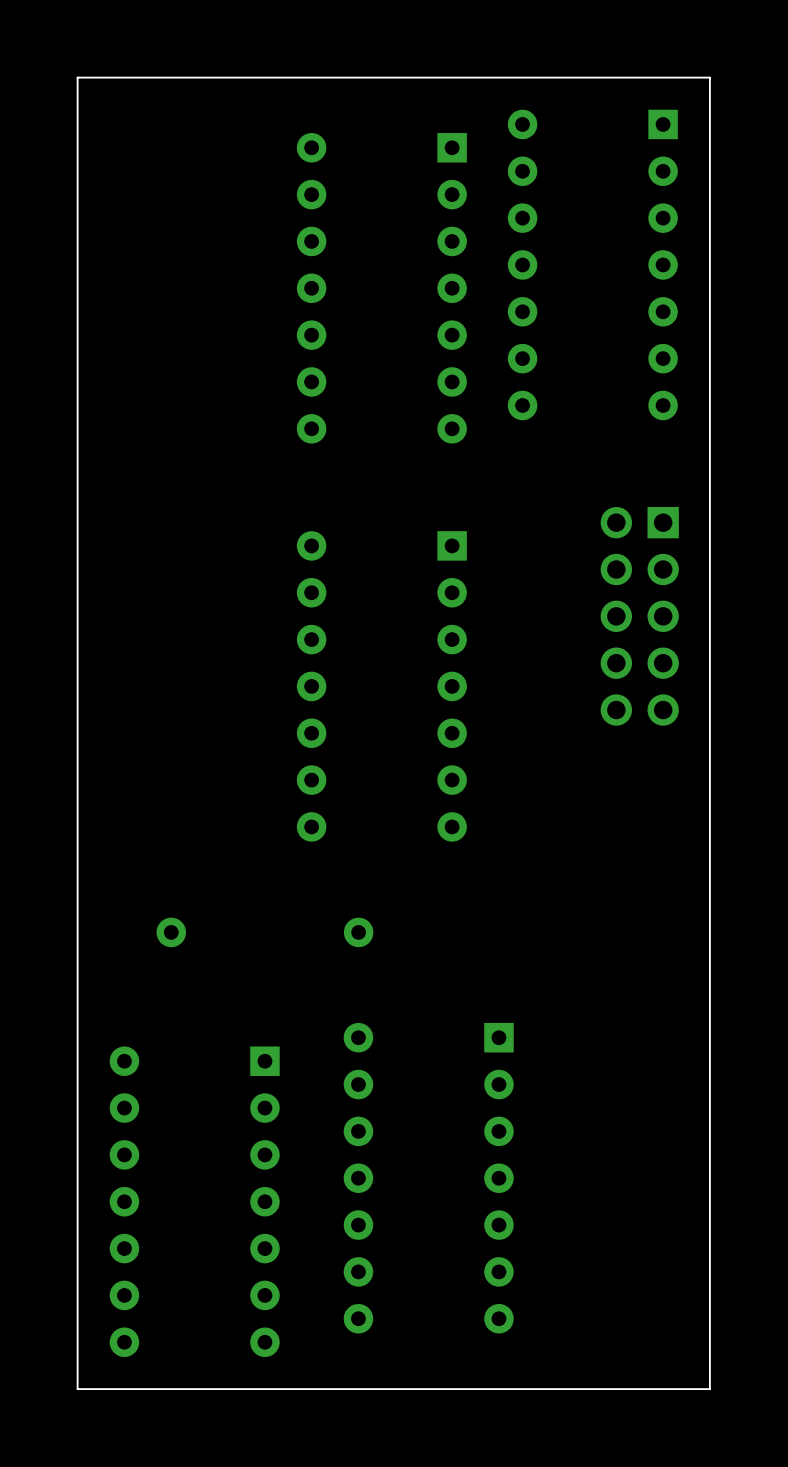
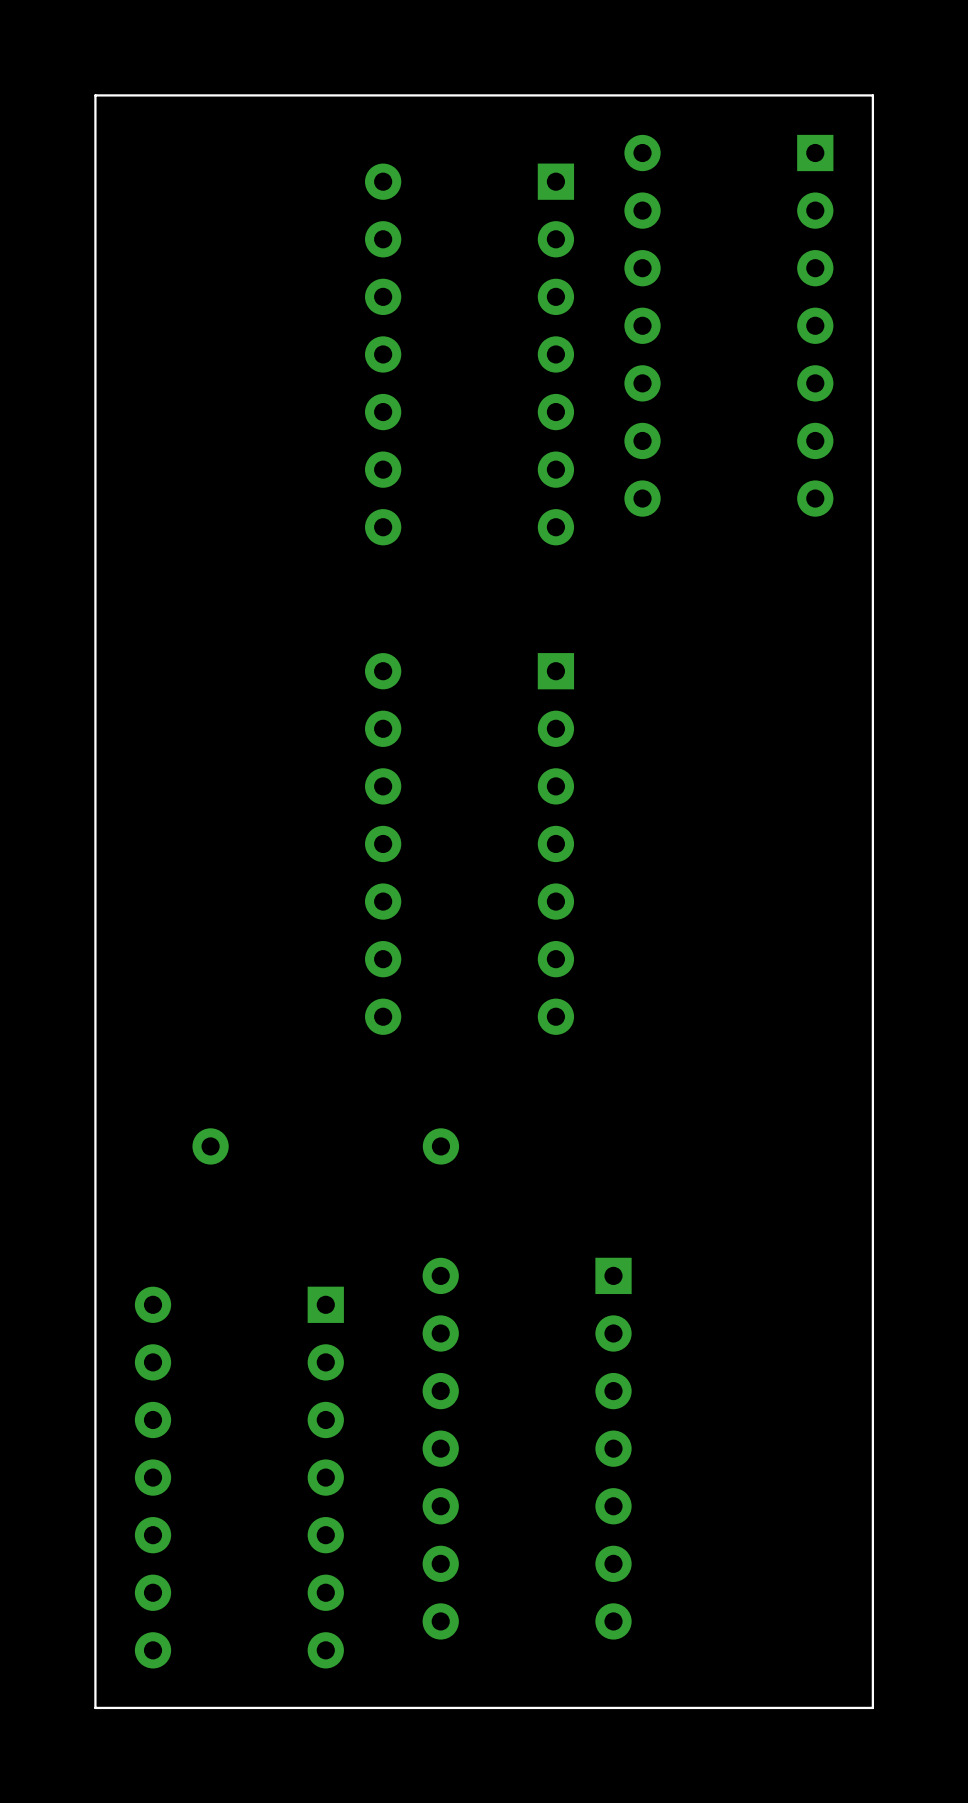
part: (639, 616) -> none

